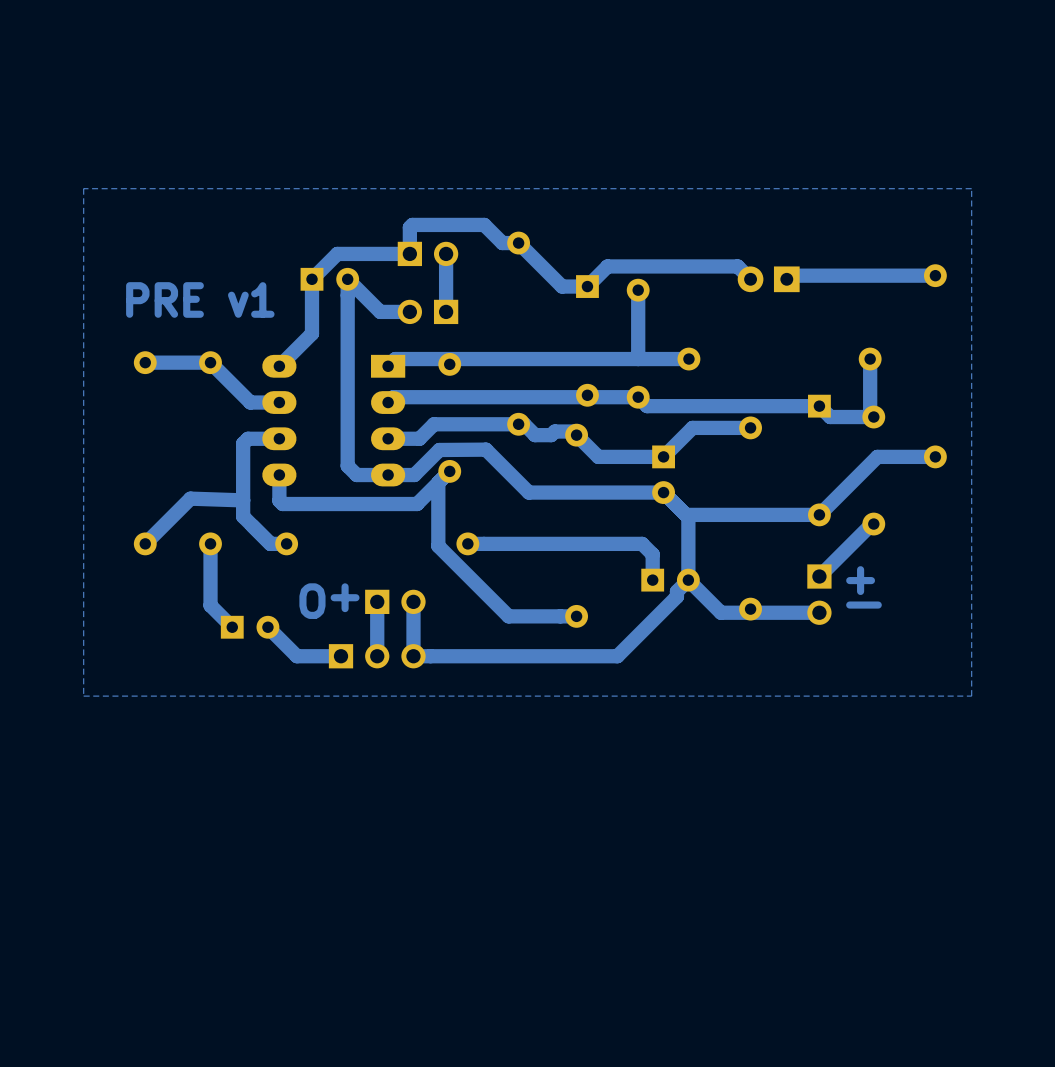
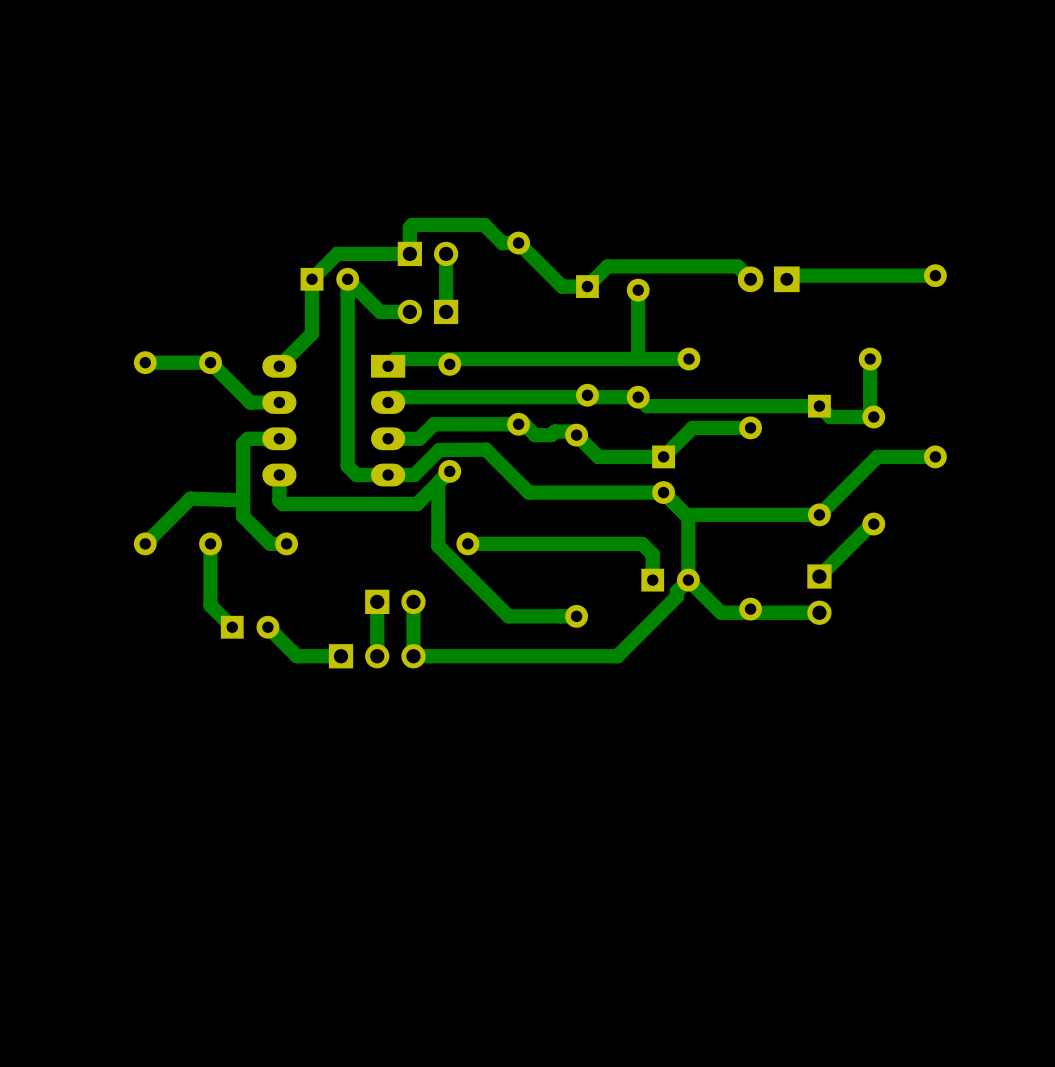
bottom zone outline: (971, 188) (971, 696) (83, 696) (83, 188) (971, 188) -> none
text: PRE v1 (200, 299) -> none
text: +I (863, 587) -> none
text: +O (329, 601) -> none

